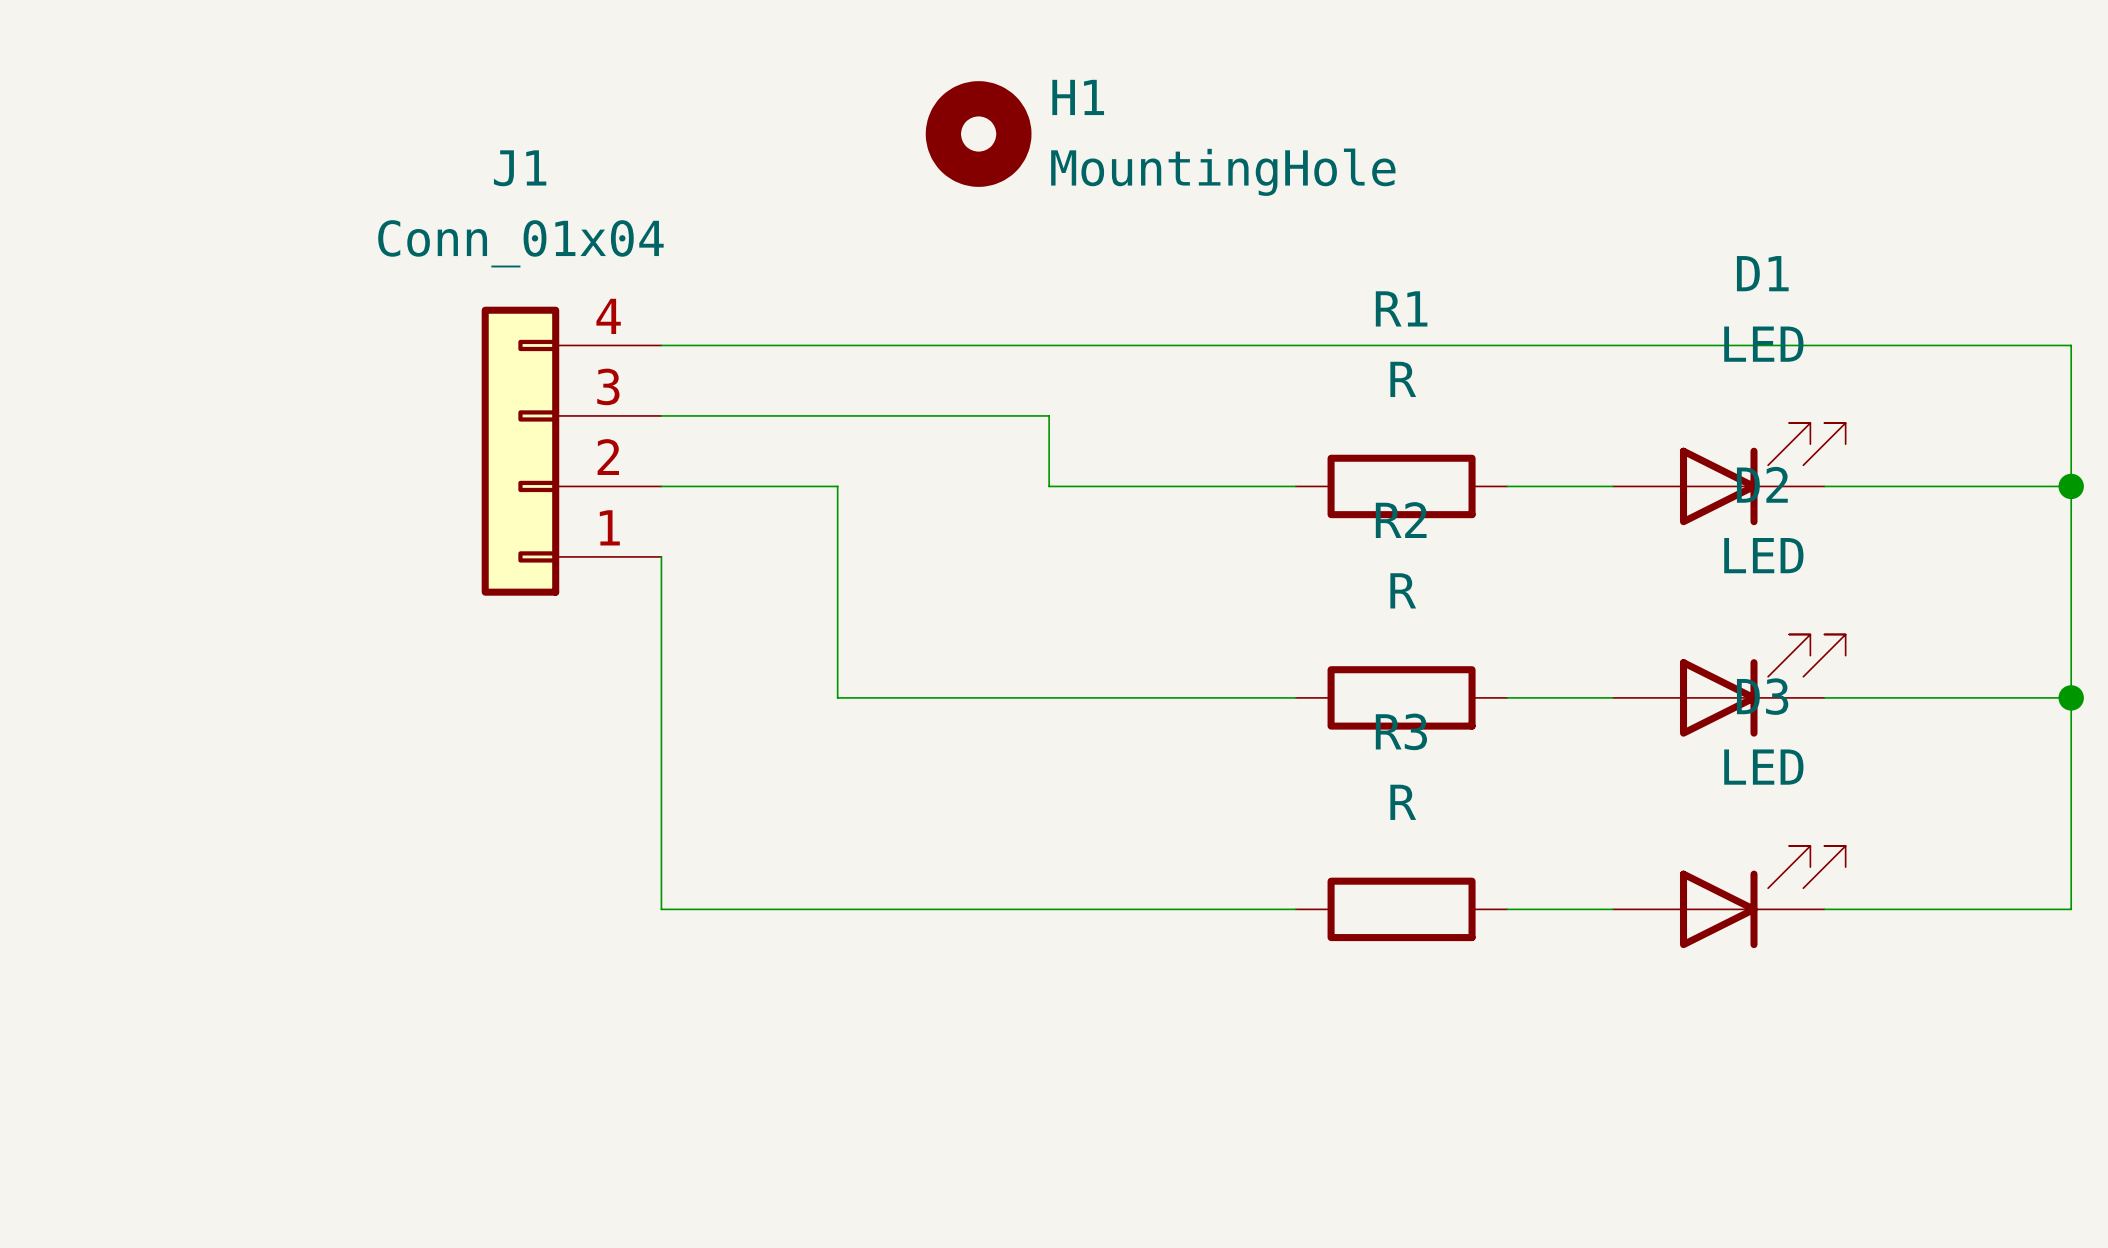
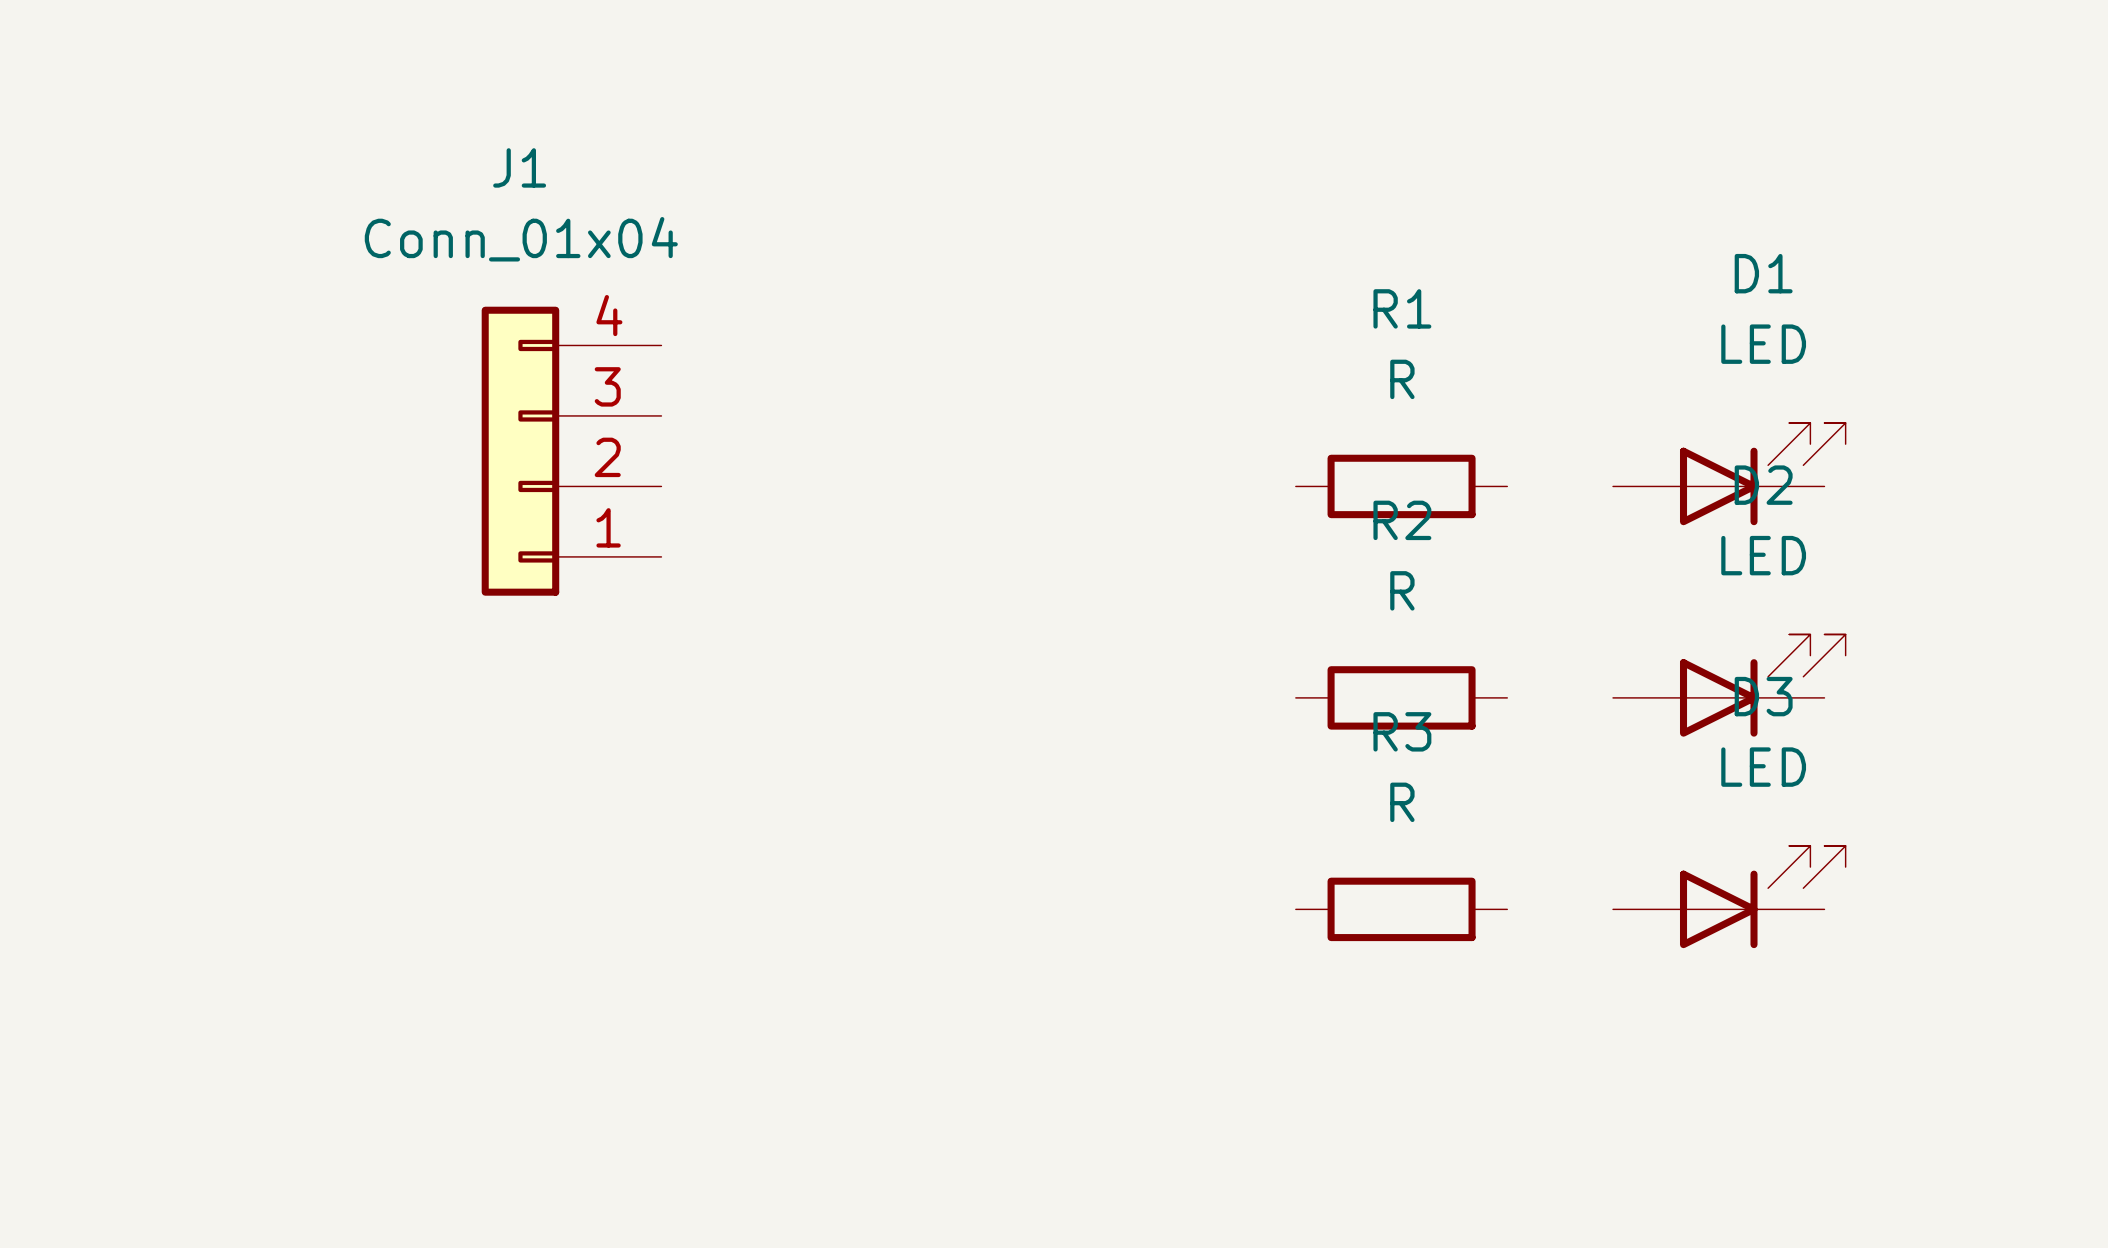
H1: MountingHole (978, 134) -> none
wire: (661, 345) (2071, 345) (2071, 909) (1824, 909) -> none
wire: (661, 415) (1049, 415) (1049, 486) (1295, 486) -> none
wire: (661, 486) (837, 486) (837, 697) (1295, 697) -> none
wire: (1507, 486) (1613, 486) -> none
wire: (1824, 486) (2071, 486) -> none
junction: (2071, 486) -> none
wire: (661, 556) (661, 909) (1295, 909) -> none
wire: (1507, 697) (1613, 697) -> none
wire: (1824, 697) (2071, 697) -> none
junction: (2071, 697) -> none
wire: (1507, 909) (1613, 909) -> none

